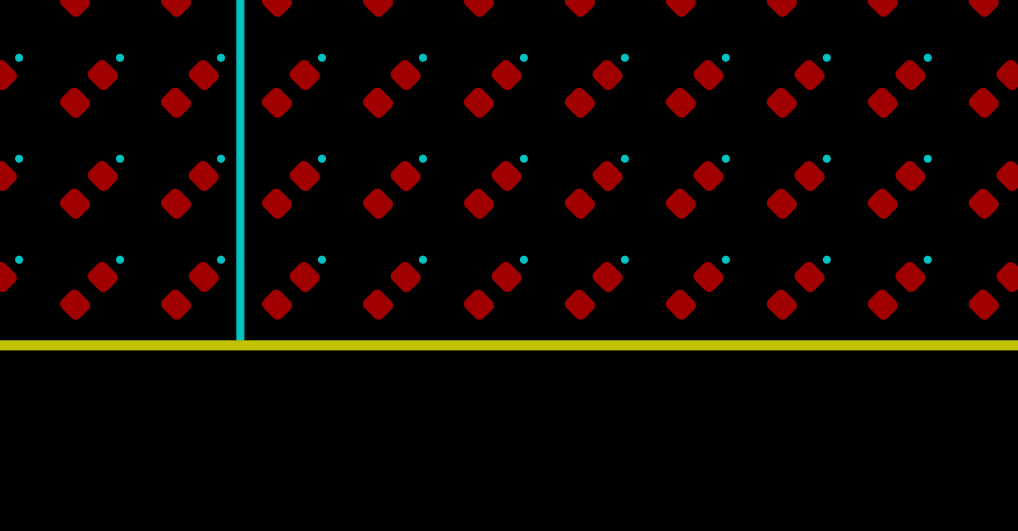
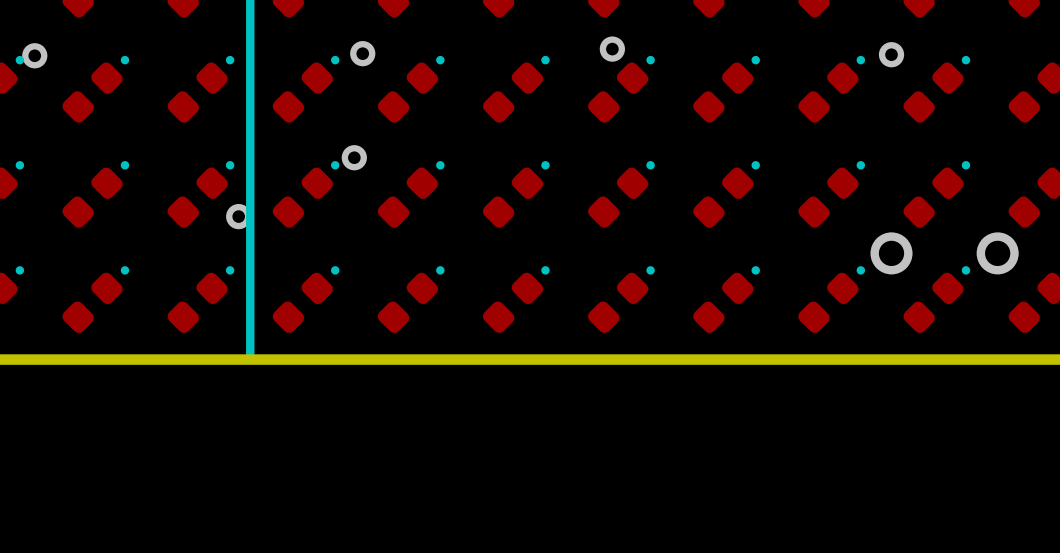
via: none -> (612, 49)
via: none -> (362, 53)
via: none -> (891, 54)
via: none -> (34, 55)
via: none -> (354, 157)
via: none -> (238, 216)
via: none -> (891, 253)
via: none -> (997, 253)

